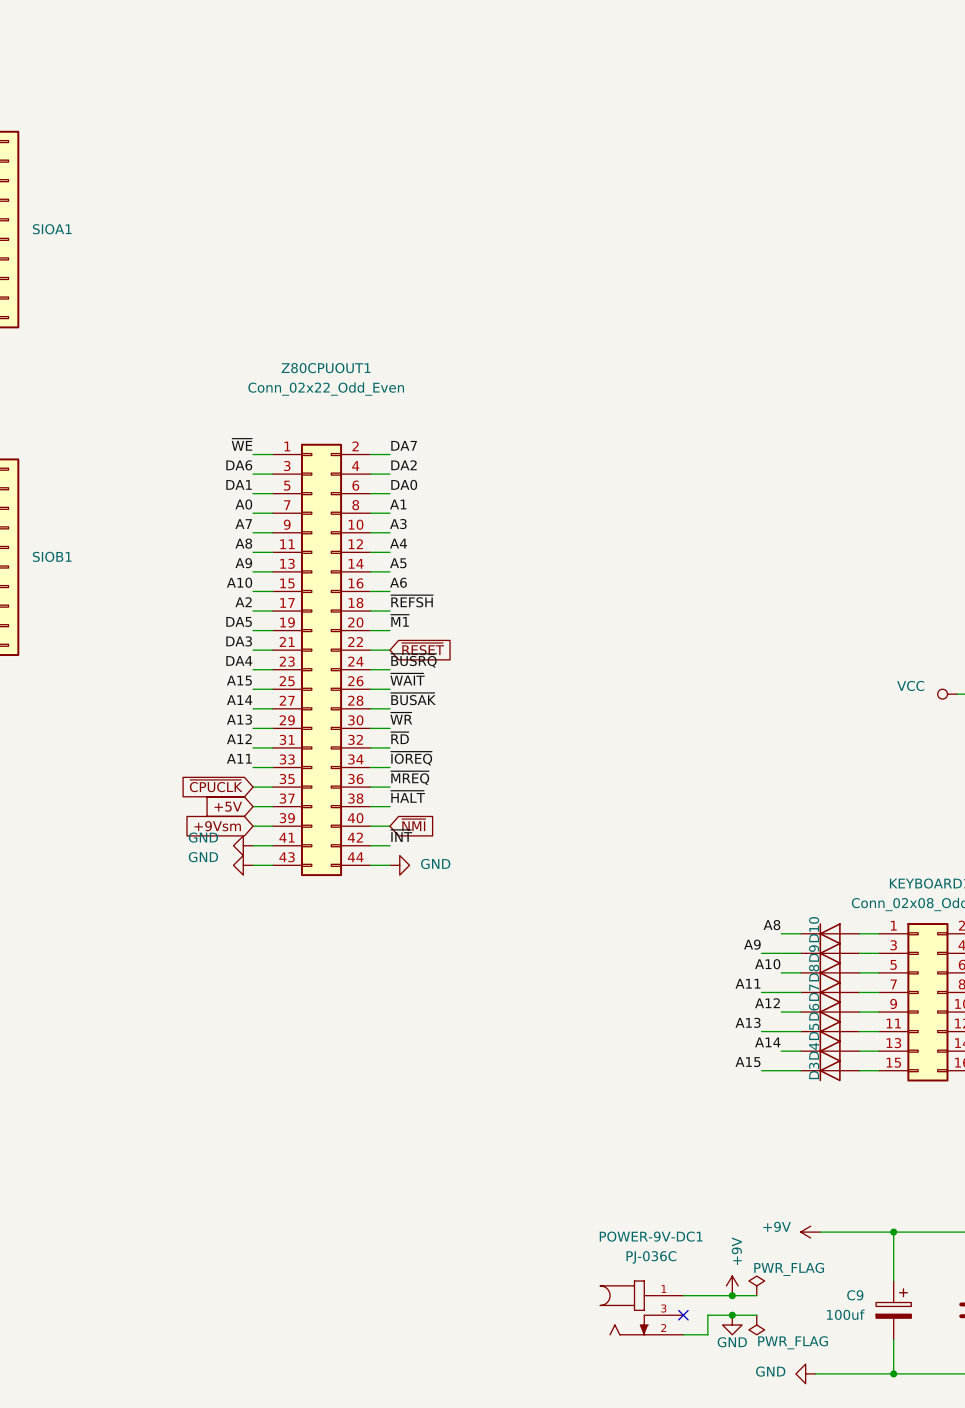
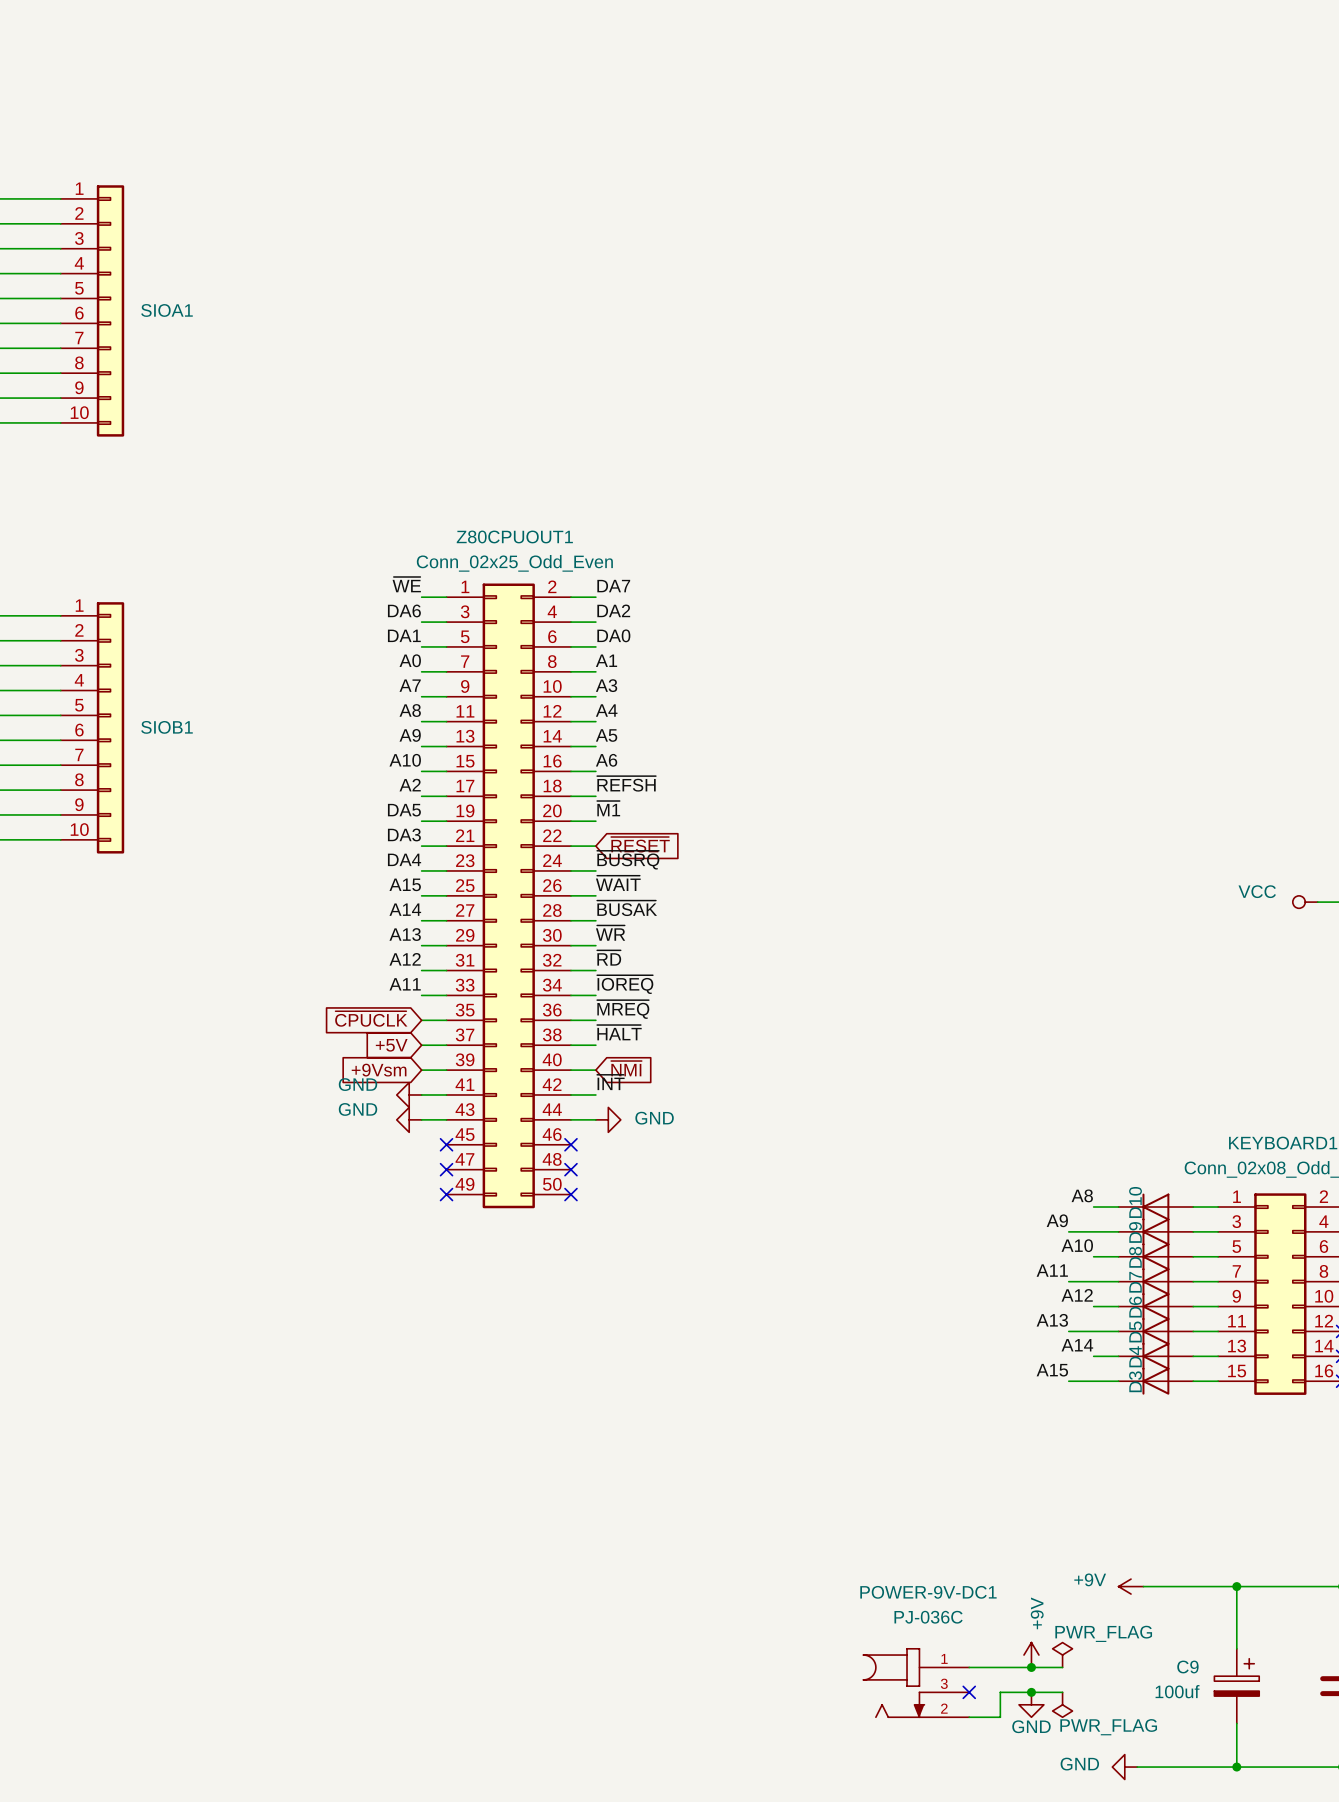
Z80CPUOUT1 value: Conn_02x22_Odd_Even (326, 389) -> Conn_02x25_Odd_Even (514, 563)
Z80CPUOUT1 symbol: [272, 443, 371, 877] -> [446, 583, 571, 1209]
no-connect mark: none -> (446, 1144)
no-connect mark: none -> (570, 1144)
no-connect mark: none -> (446, 1169)
no-connect mark: none -> (570, 1169)
no-connect mark: none -> (446, 1194)
no-connect mark: none -> (570, 1194)

